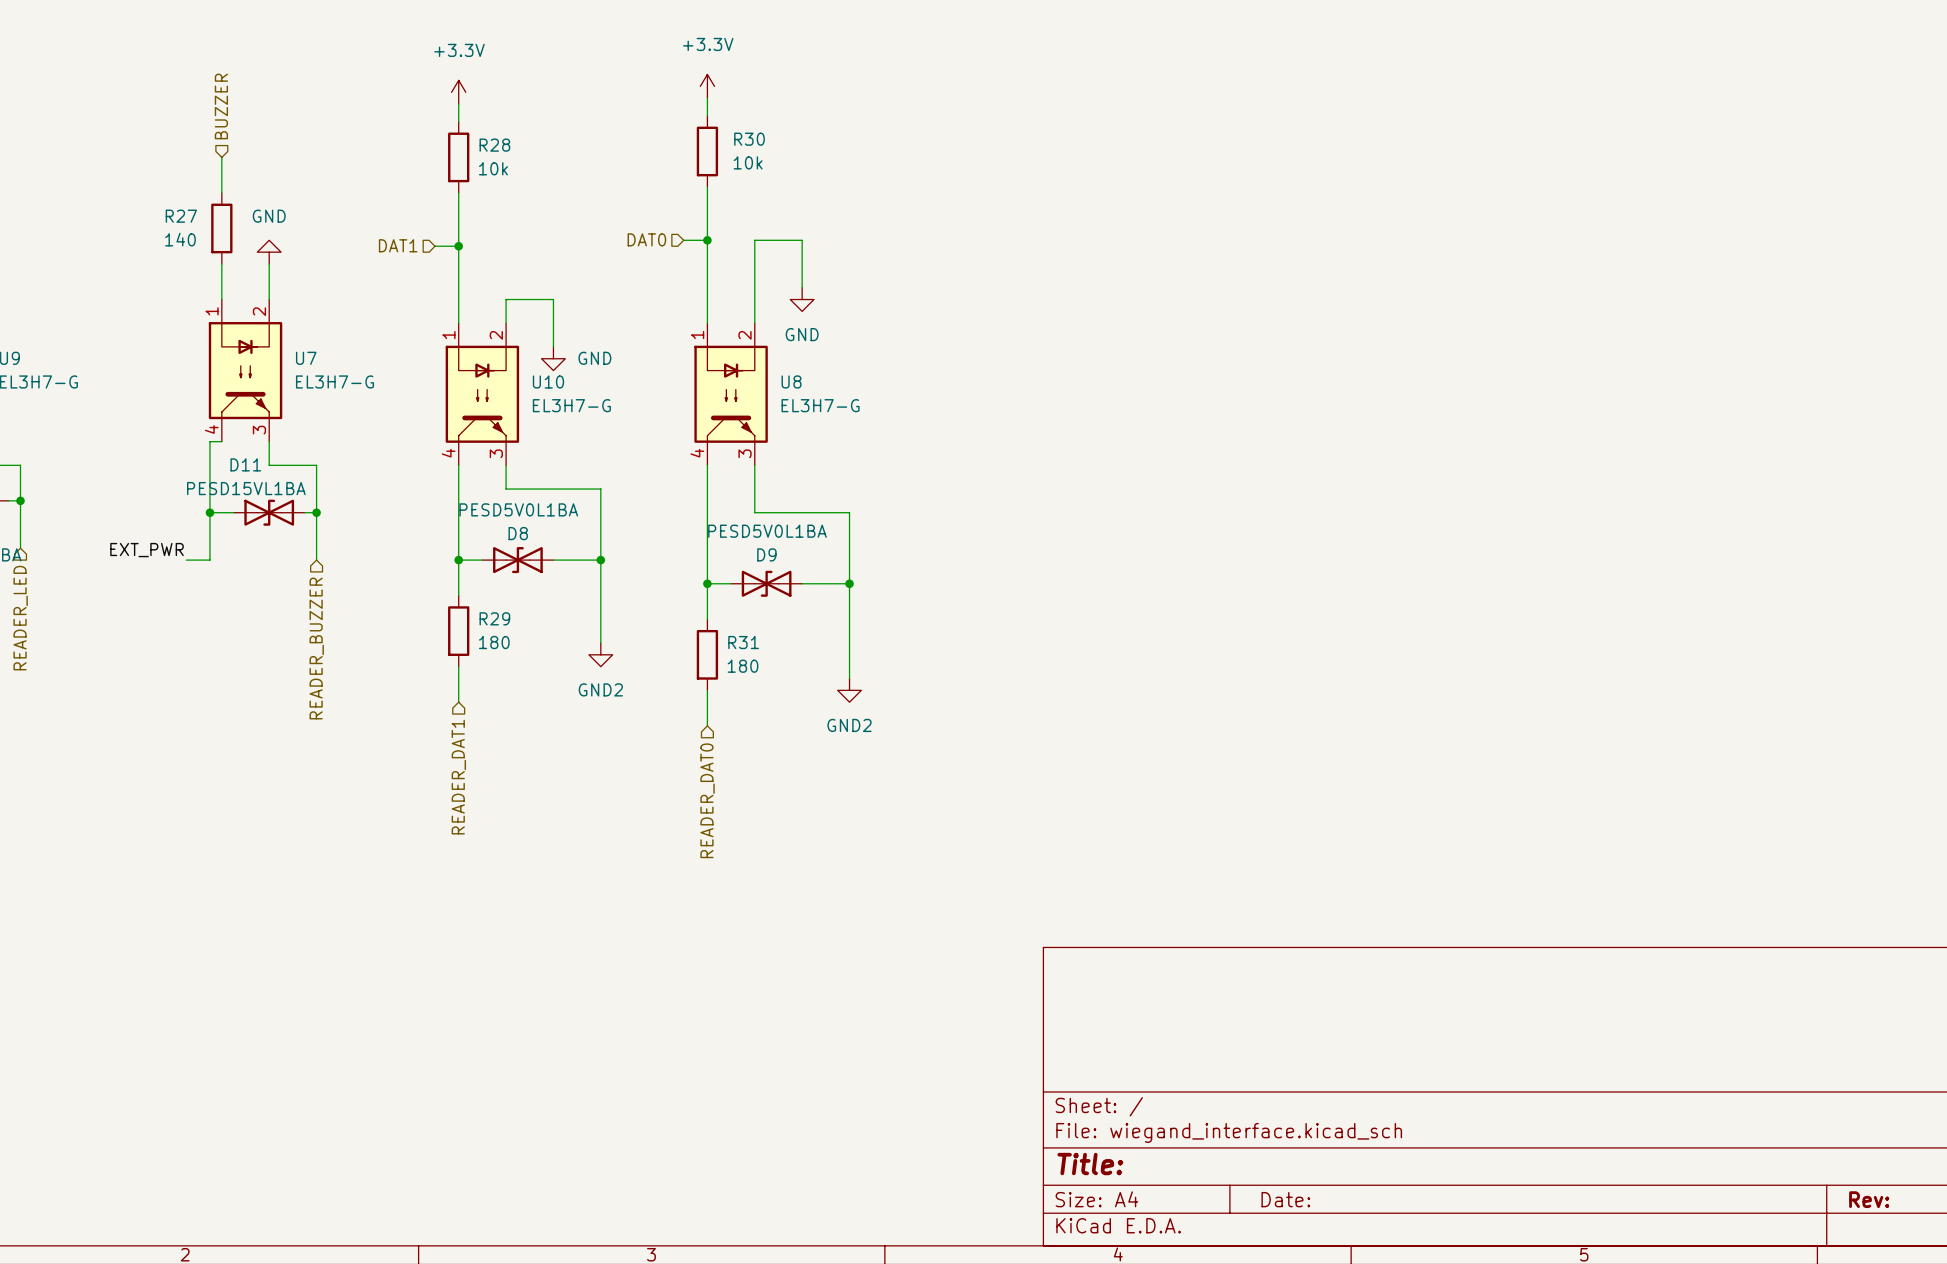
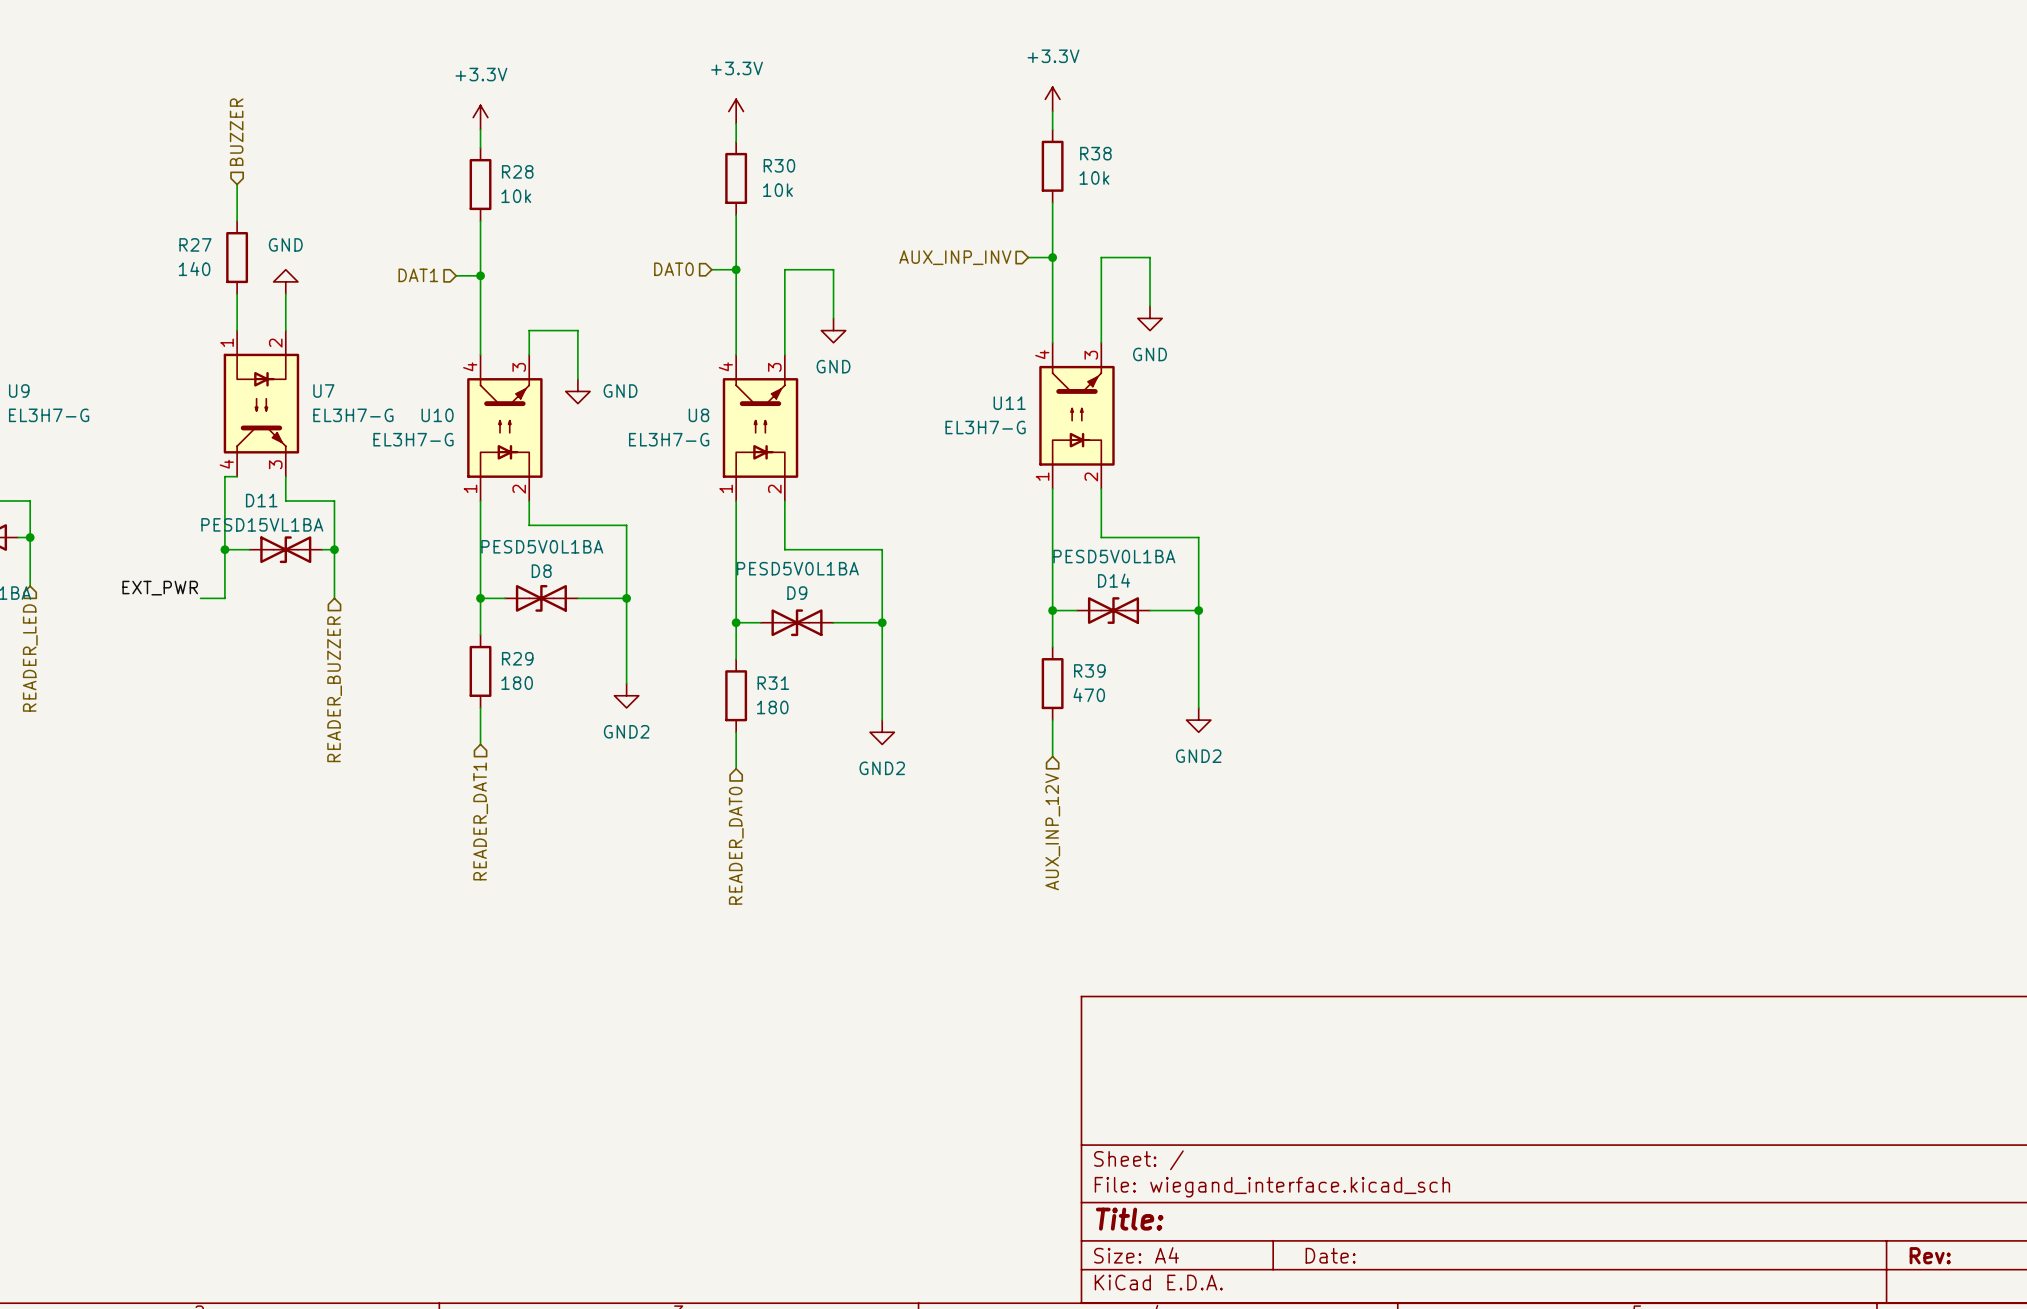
power symbol: none -> +3.3V (1052, 99)
wire: none -> (1052, 111) (1052, 129)
R38: none -> 10k (1052, 166)
wire: none -> (1052, 202) (1052, 342)
hierarchical label: none -> AUX_INP_INV (955, 257)
wire: none -> (1028, 257) (1052, 257)
junction: none -> (1052, 257)
wire: none -> (1150, 306) (1150, 257) (1101, 257) (1101, 342)
power symbol: none -> GND (1150, 318)
U10 name position: U10 (548, 381) -> U10 (437, 415)
U8 name position: U8 (791, 381) -> U8 (698, 415)
U11: none -> EL3H7-G (1076, 415)
U10 flip: as is (482, 394) -> up-down (504, 427)
U8 flip: as is (731, 394) -> up-down (760, 427)
U10 value position: EL3H7-G (571, 405) -> EL3H7-G (413, 439)
U8 value position: EL3H7-G (820, 405) -> EL3H7-G (669, 439)
wire: none -> (1052, 488) (1052, 647)
wire: none -> (1101, 488) (1101, 537) (1198, 537) (1198, 707)
wire: none -> (1052, 610) (1076, 610)
junction: none -> (1052, 610)
D14: none -> PESD5V0L1BA (1113, 610)
wire: none -> (1150, 610) (1198, 610)
junction: none -> (1198, 610)
R39: none -> 470 (1052, 683)
wire: none -> (1052, 720) (1052, 756)
power symbol: none -> GND2 (1198, 720)
hierarchical label: none -> AUX_INP_12V (1052, 831)

